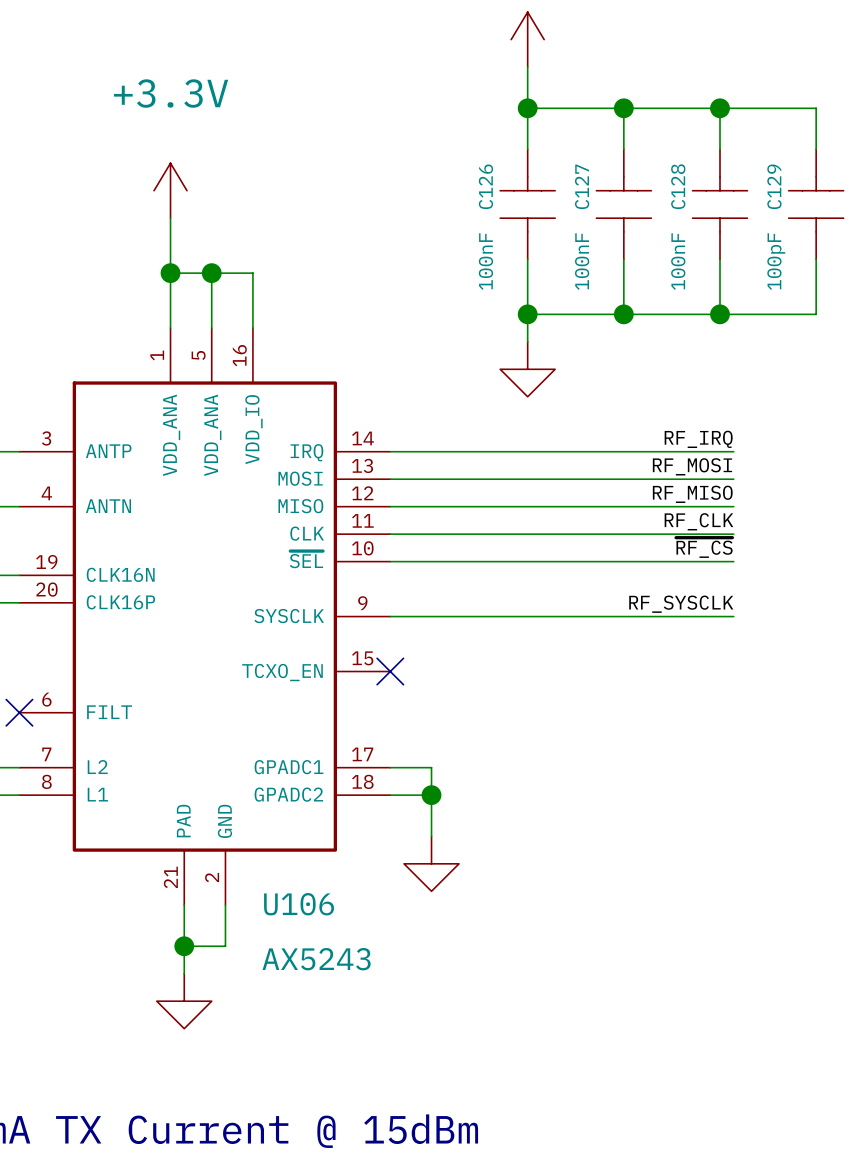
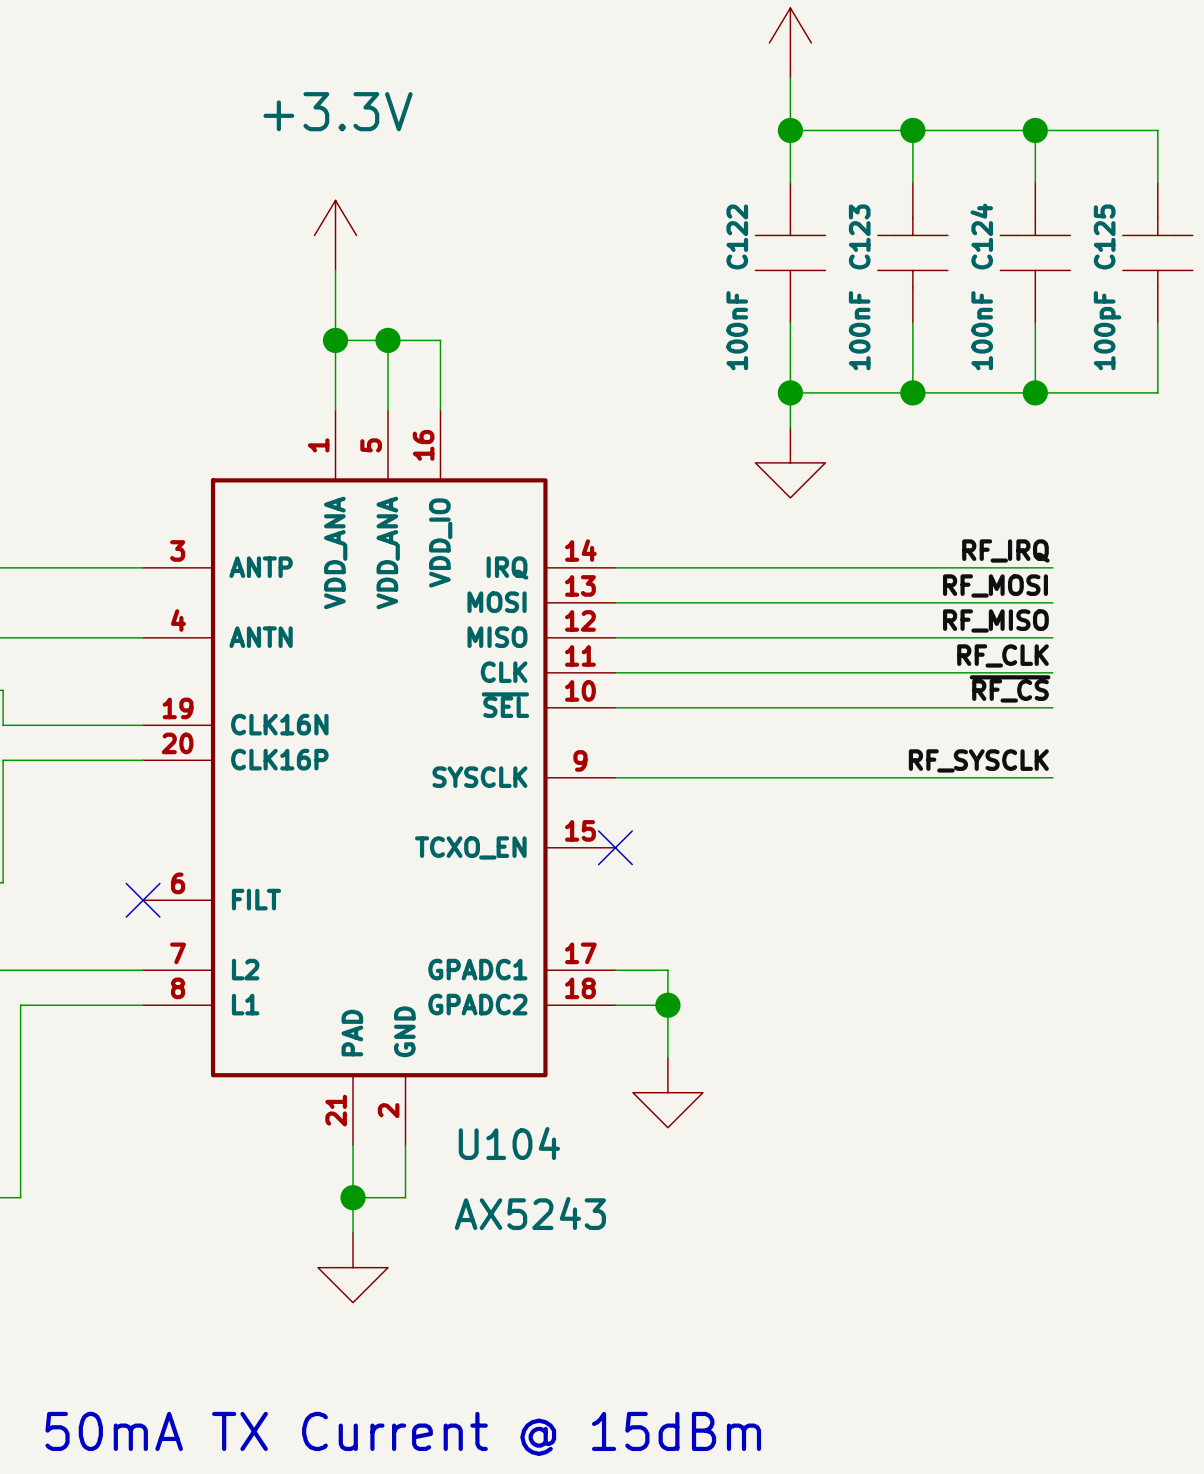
C126 name: C126 (485, 186) -> C122 (737, 236)
C127 name: C127 (582, 186) -> C123 (859, 236)
C128 name: C128 (678, 186) -> C124 (981, 236)
C129 name: C129 (774, 186) -> C125 (1104, 236)
U106 name: U106 (299, 904) -> U104 (509, 1143)

